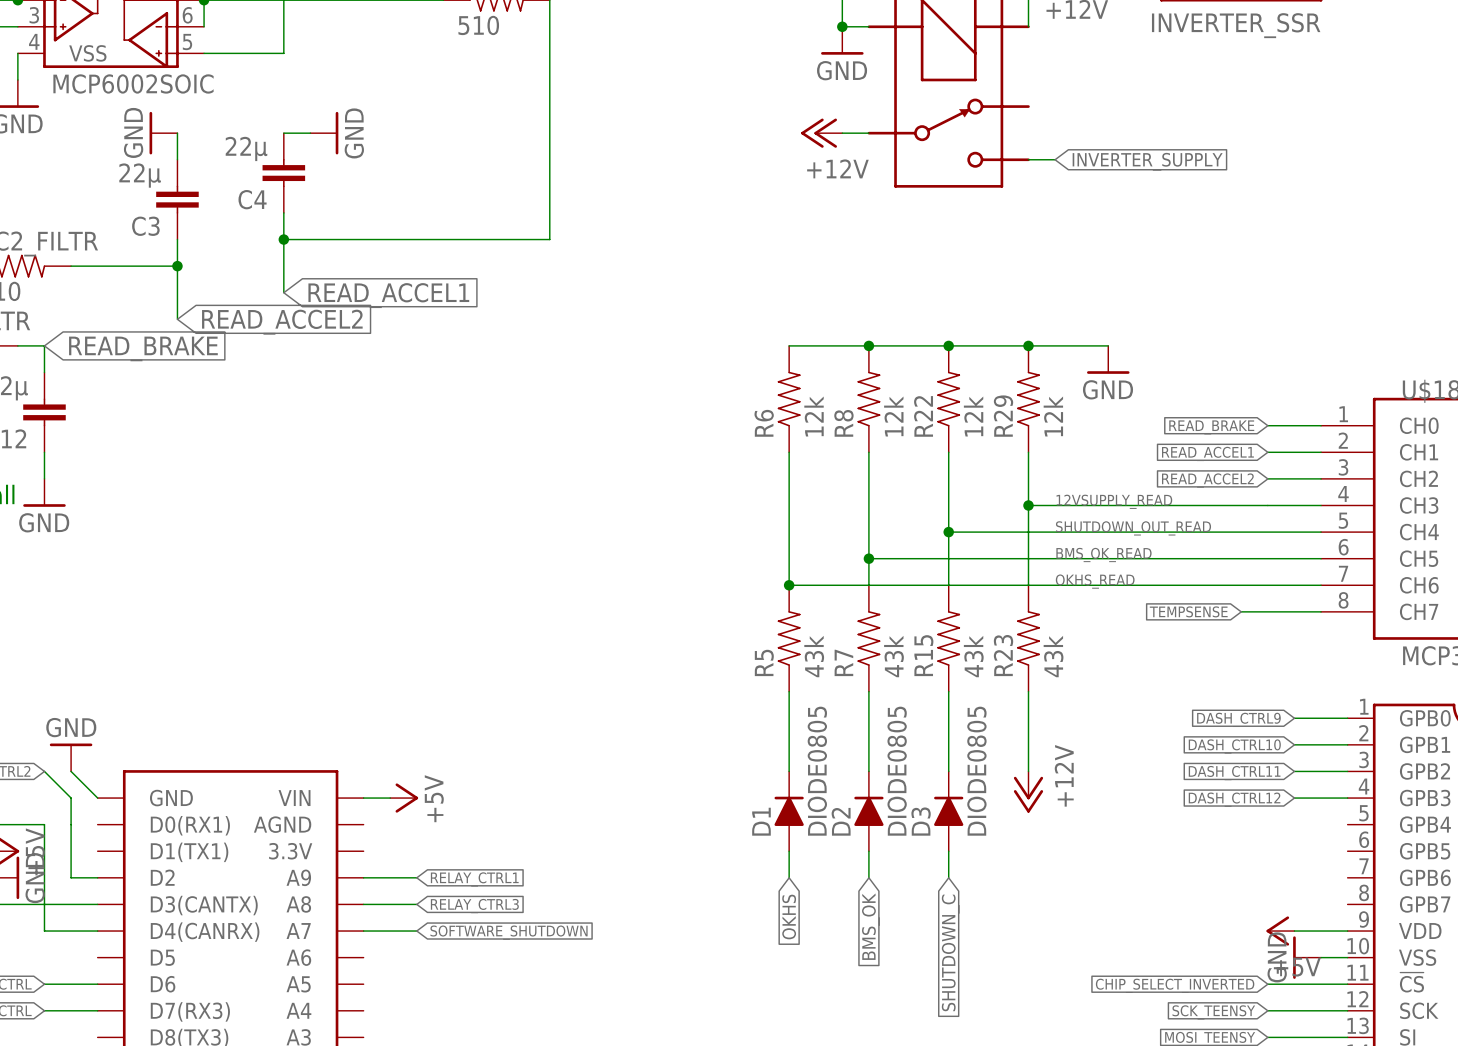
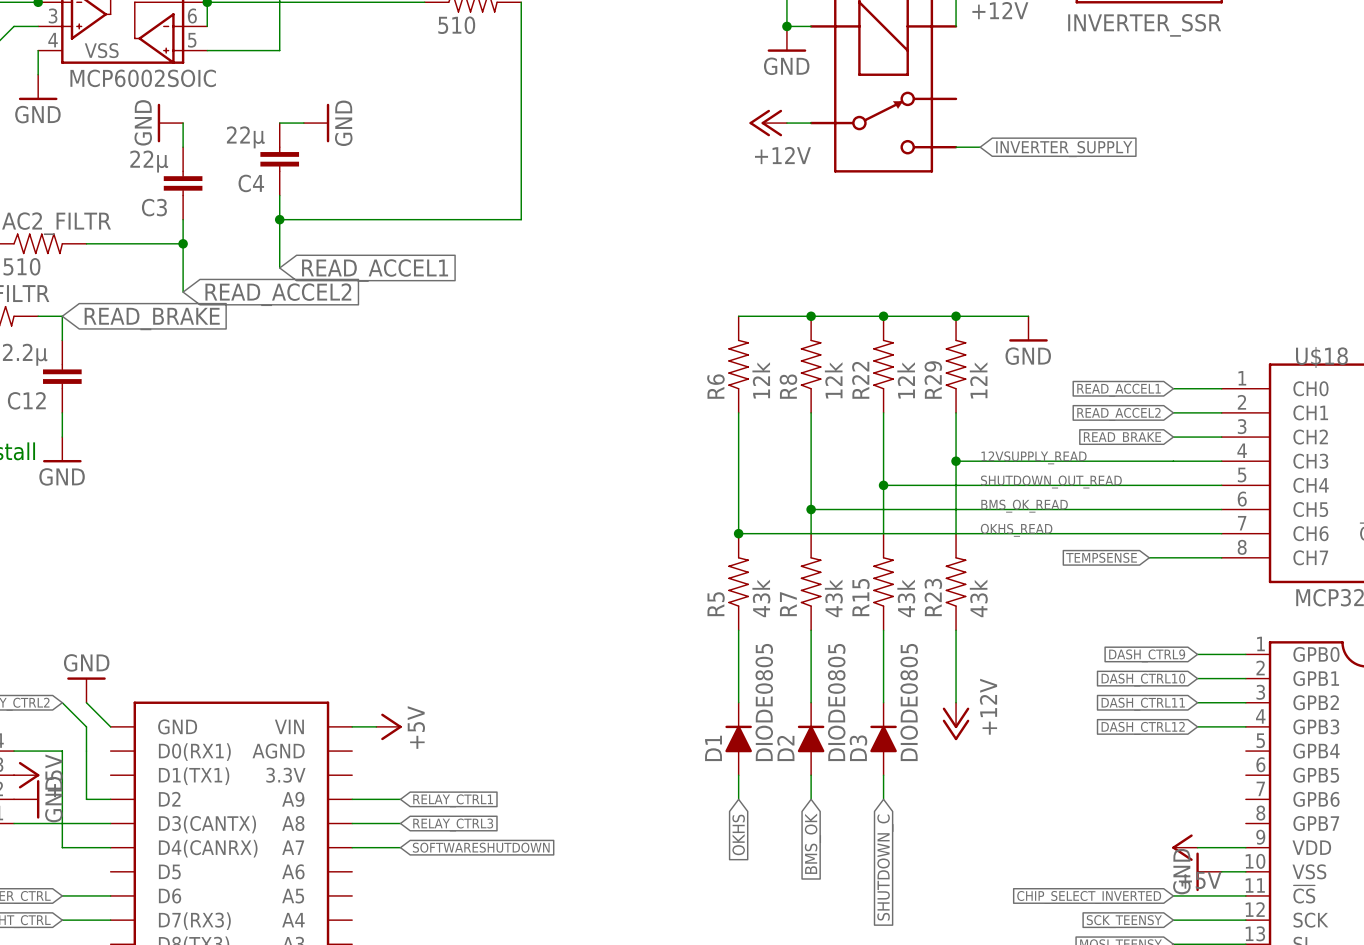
global label: READ_BRAKE (1211, 427) -> READ_ACCEL1 (1119, 390)
global label: READ_ACCEL1 (1207, 453) -> READ_ACCEL2 (1118, 414)
global label: READ_ACCEL2 (1207, 480) -> READ_BRAKE (1122, 438)
global label: SOFTWARE_SHUTDOWN (509, 932) -> SOFTWARESHUTDOWN (481, 847)

